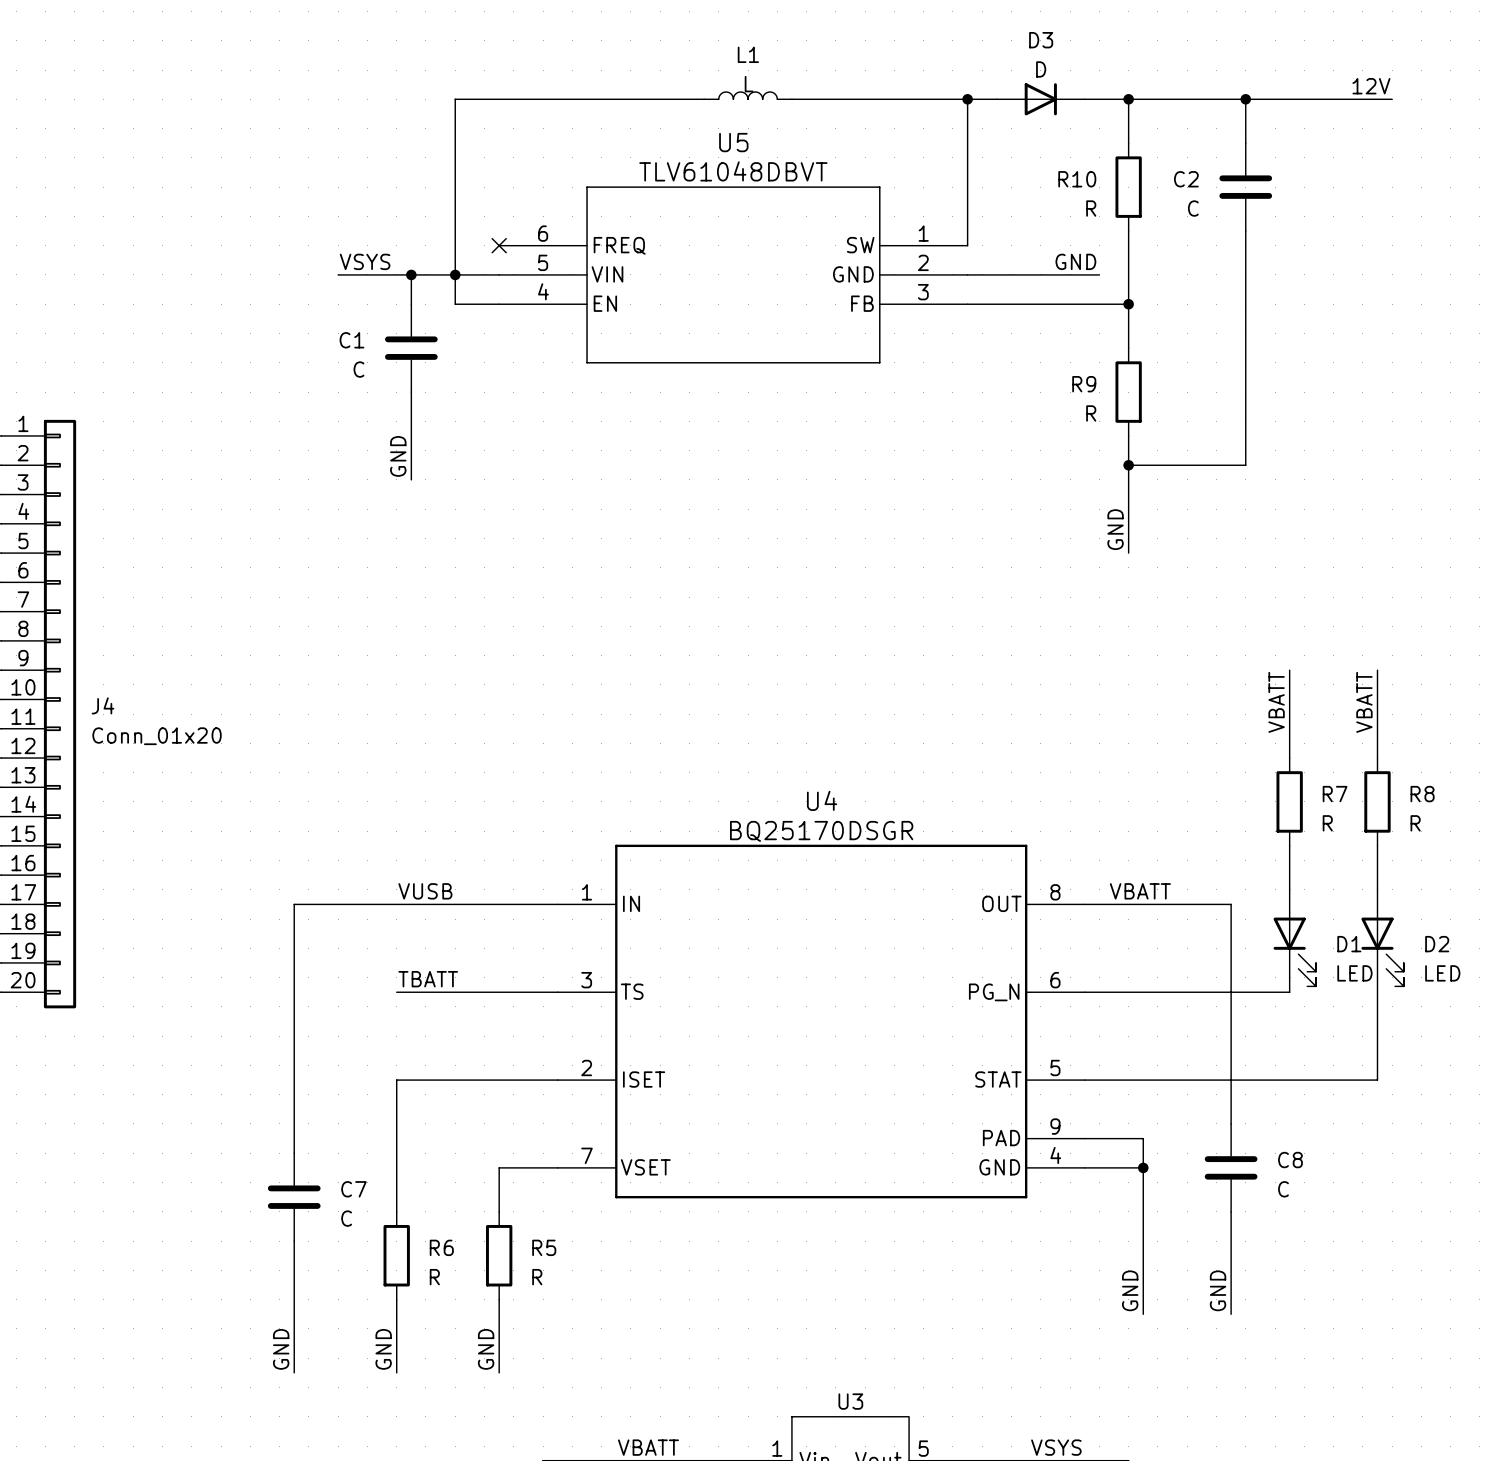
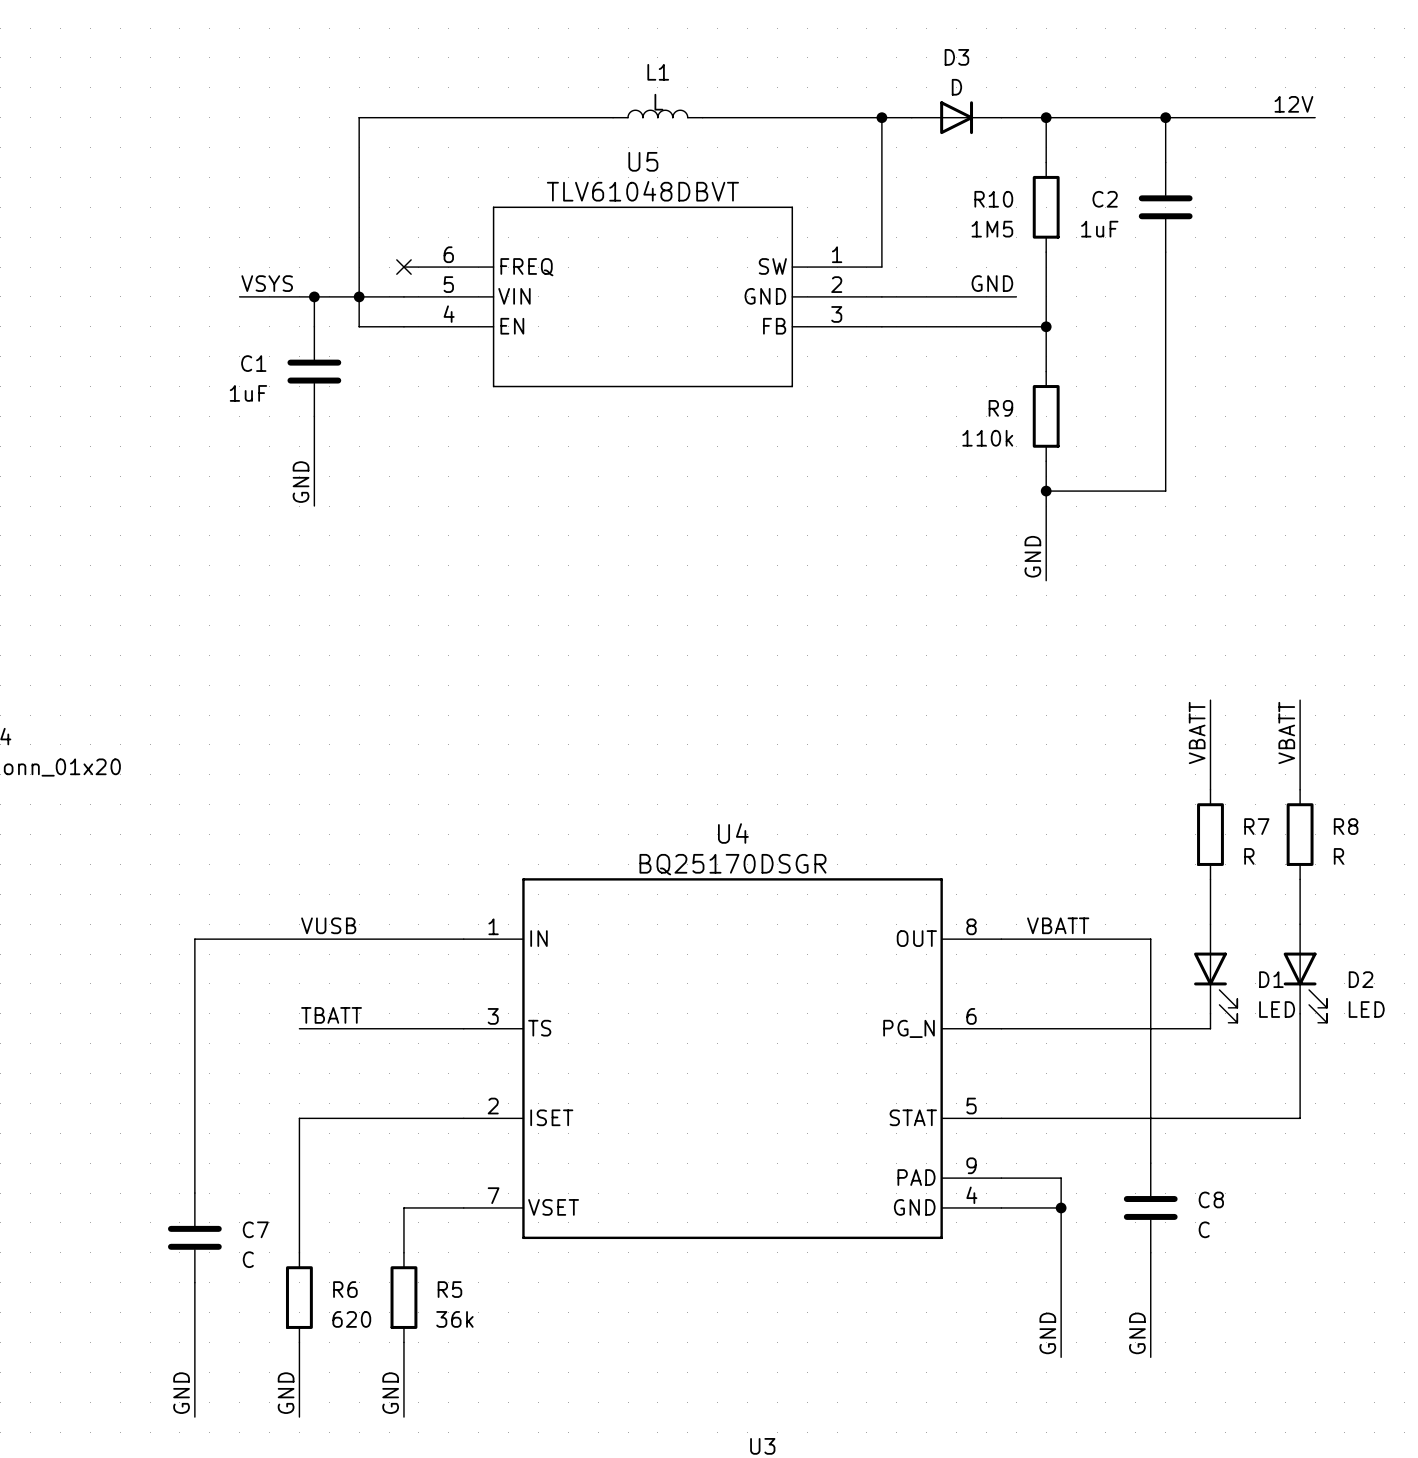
R10 value: R (1091, 208) -> 1M5 (992, 229)
C2 value: C (1193, 208) -> 1uF (1099, 229)
C1 value: C (358, 369) -> 1uF (248, 393)
R9 value: R (1091, 413) -> 110k (987, 438)
R6 value: R (434, 1277) -> 620 (351, 1319)
R5 value: R (537, 1277) -> 36k (454, 1319)

